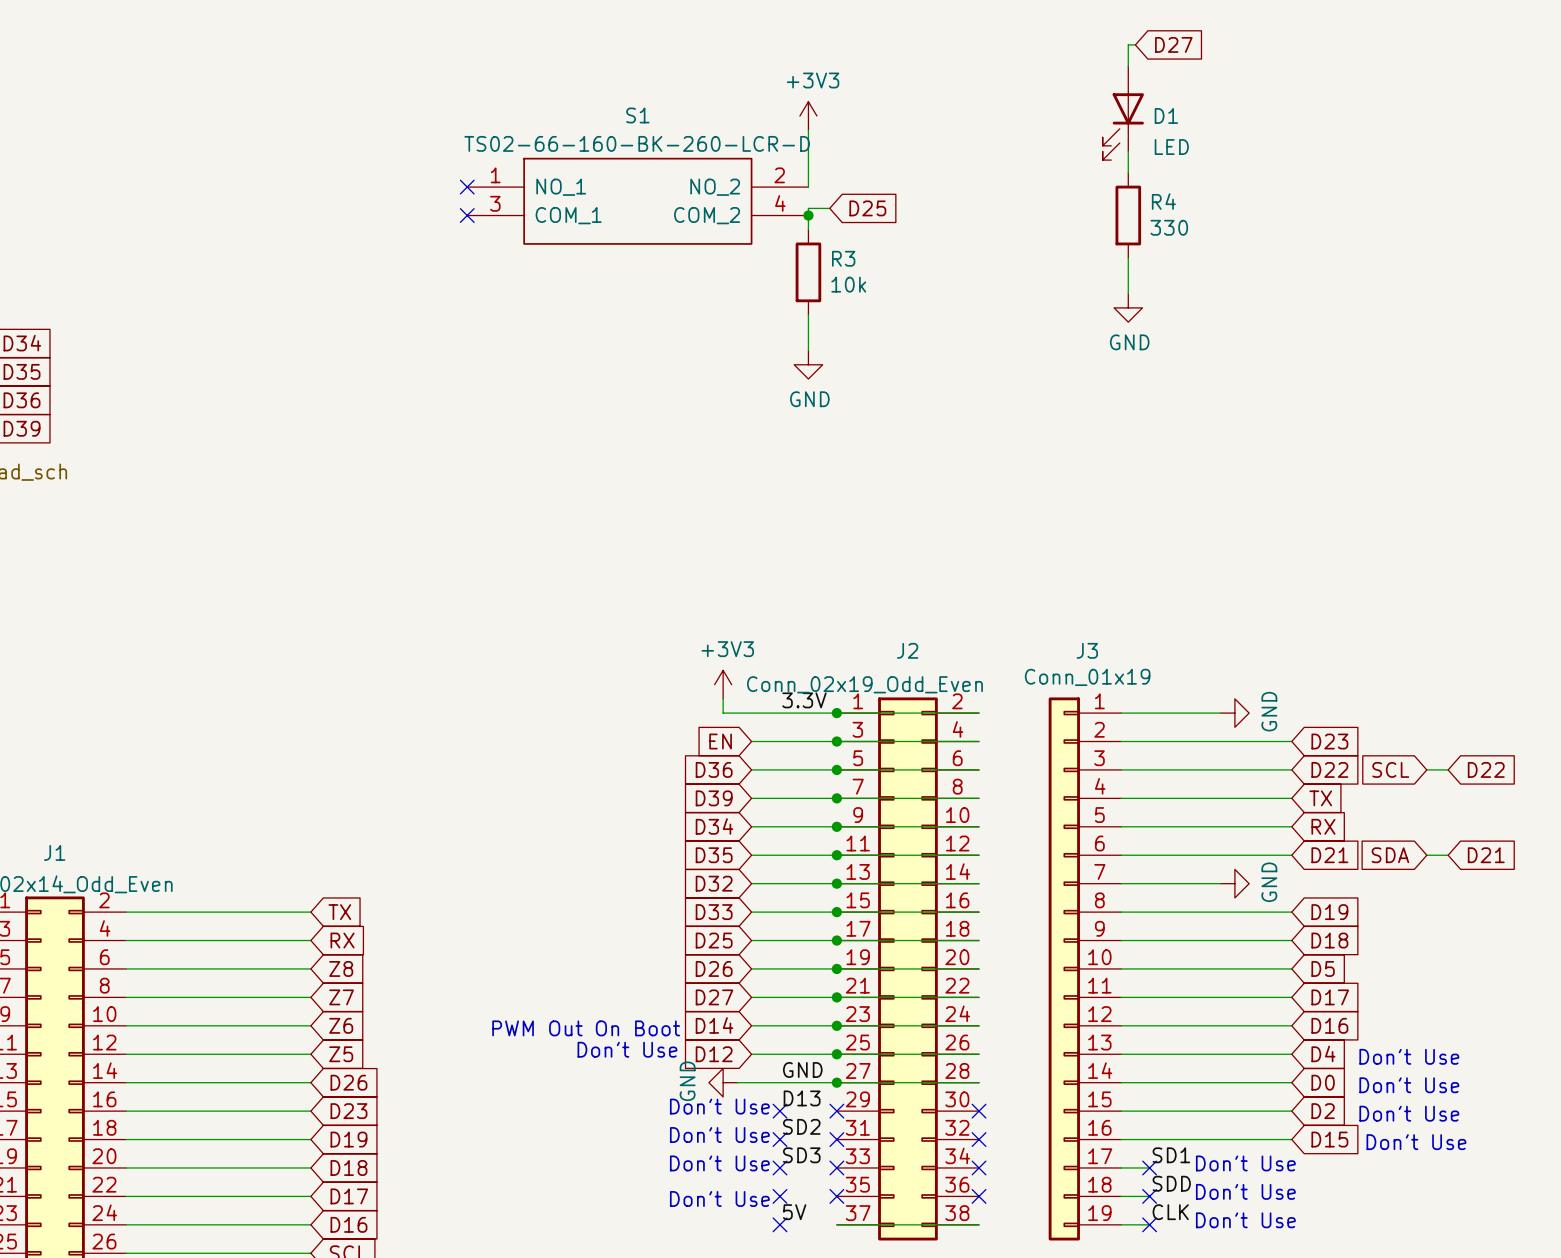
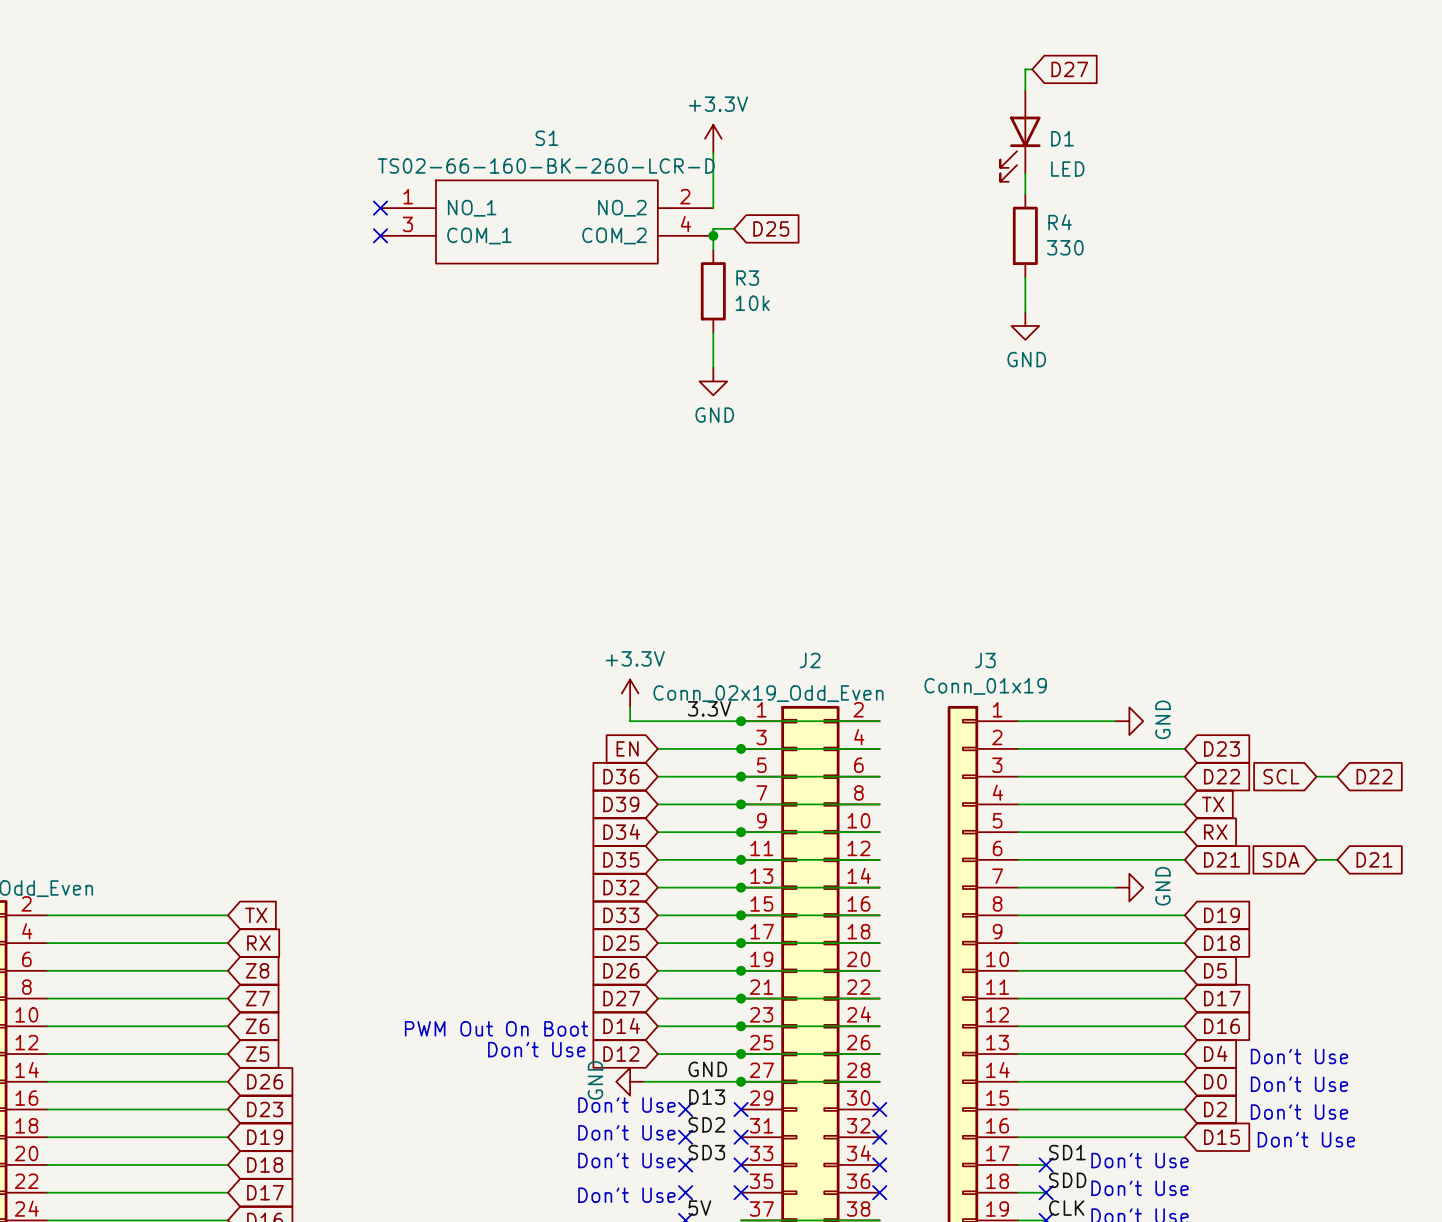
power symbol: +3V3 (808, 116) -> +3.3V (713, 138)
power symbol: +3V3 (723, 684) -> +3.3V (630, 693)

